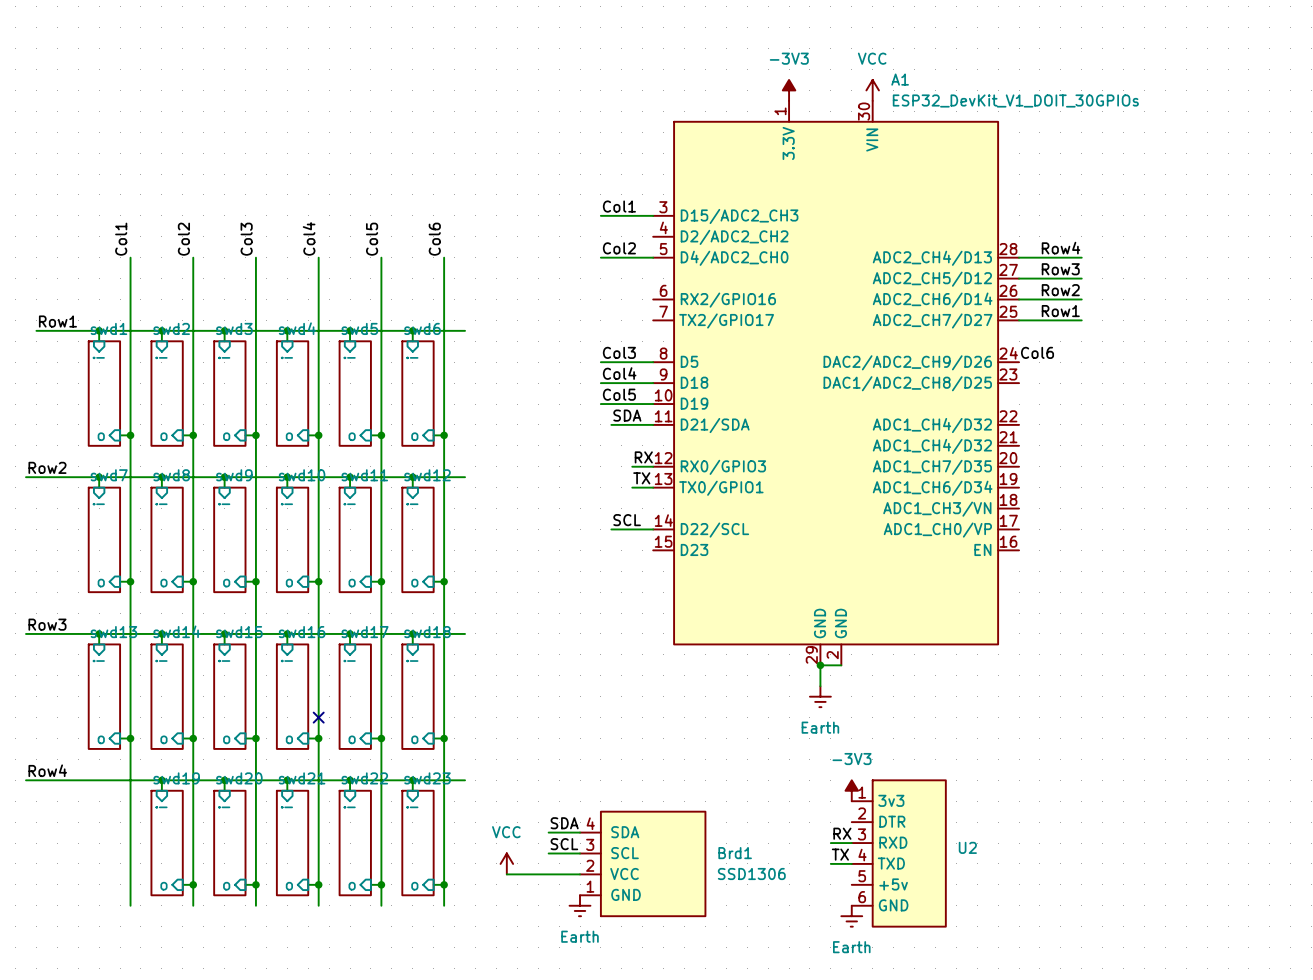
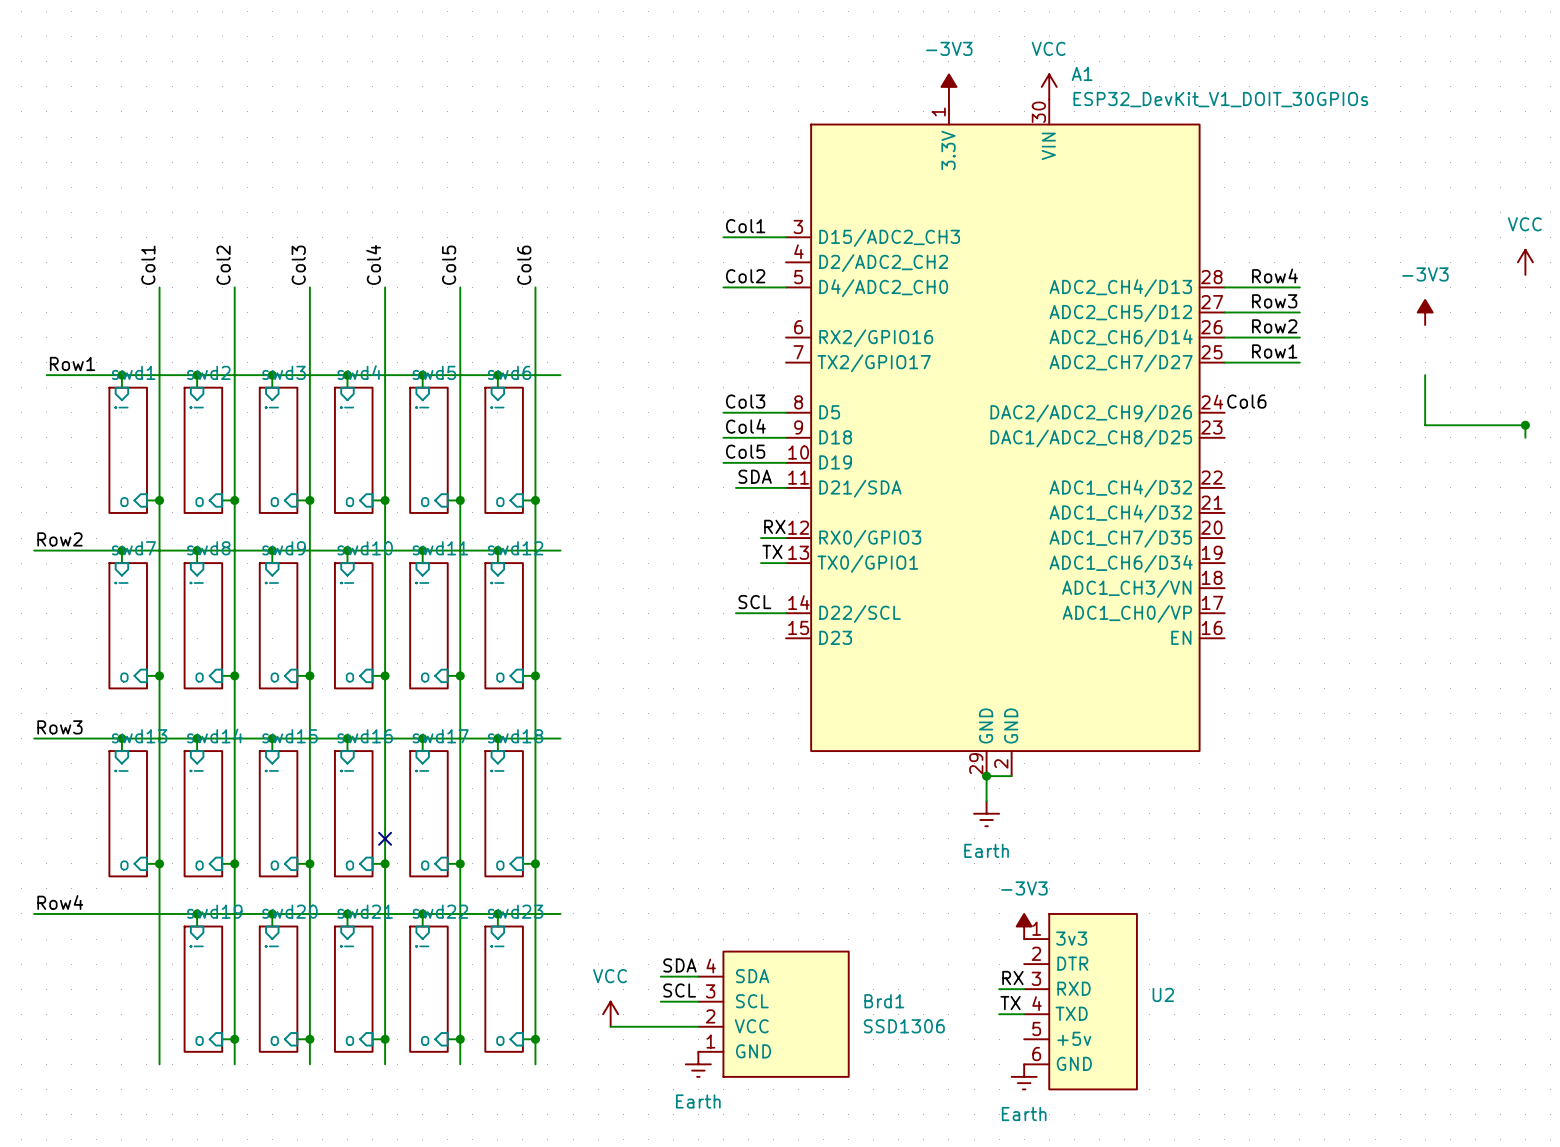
power symbol: none -> VCC (1525, 262)
power symbol: none -> -3V3 (1425, 312)
wire: none -> (1425, 375) (1425, 425) (1525, 425) (1525, 437)
junction: none -> (1525, 425)

